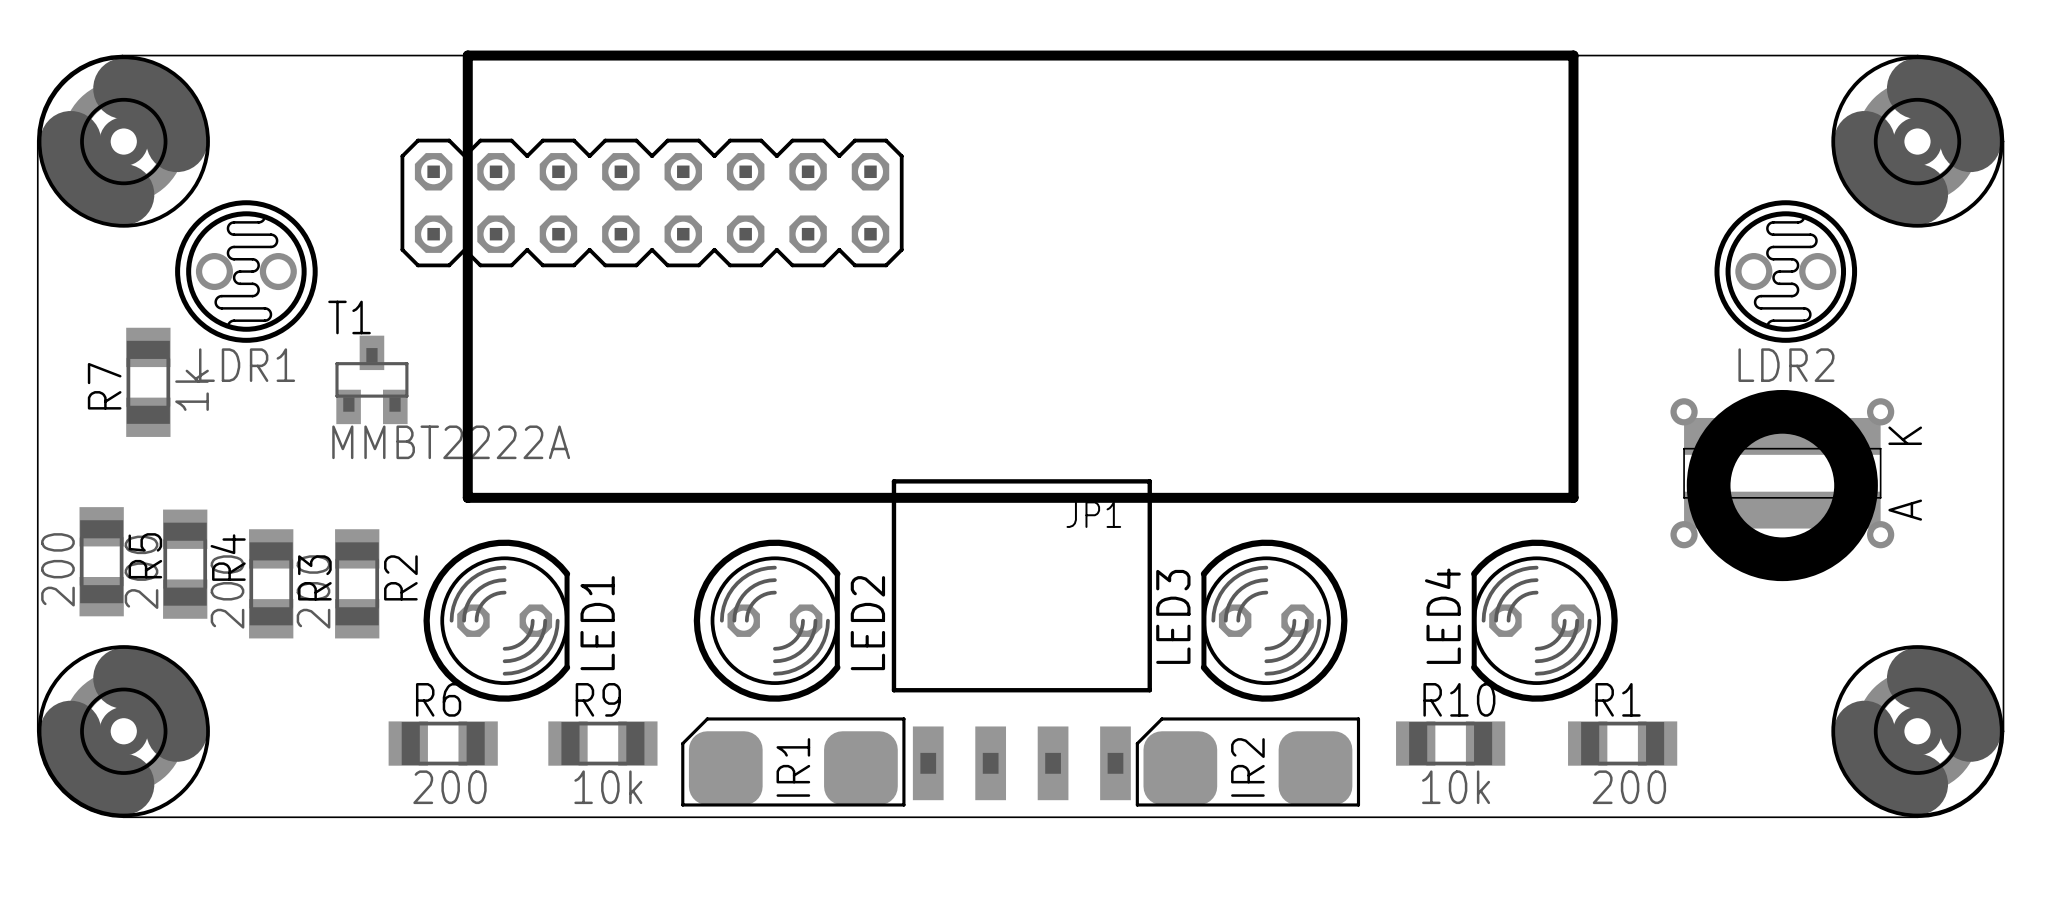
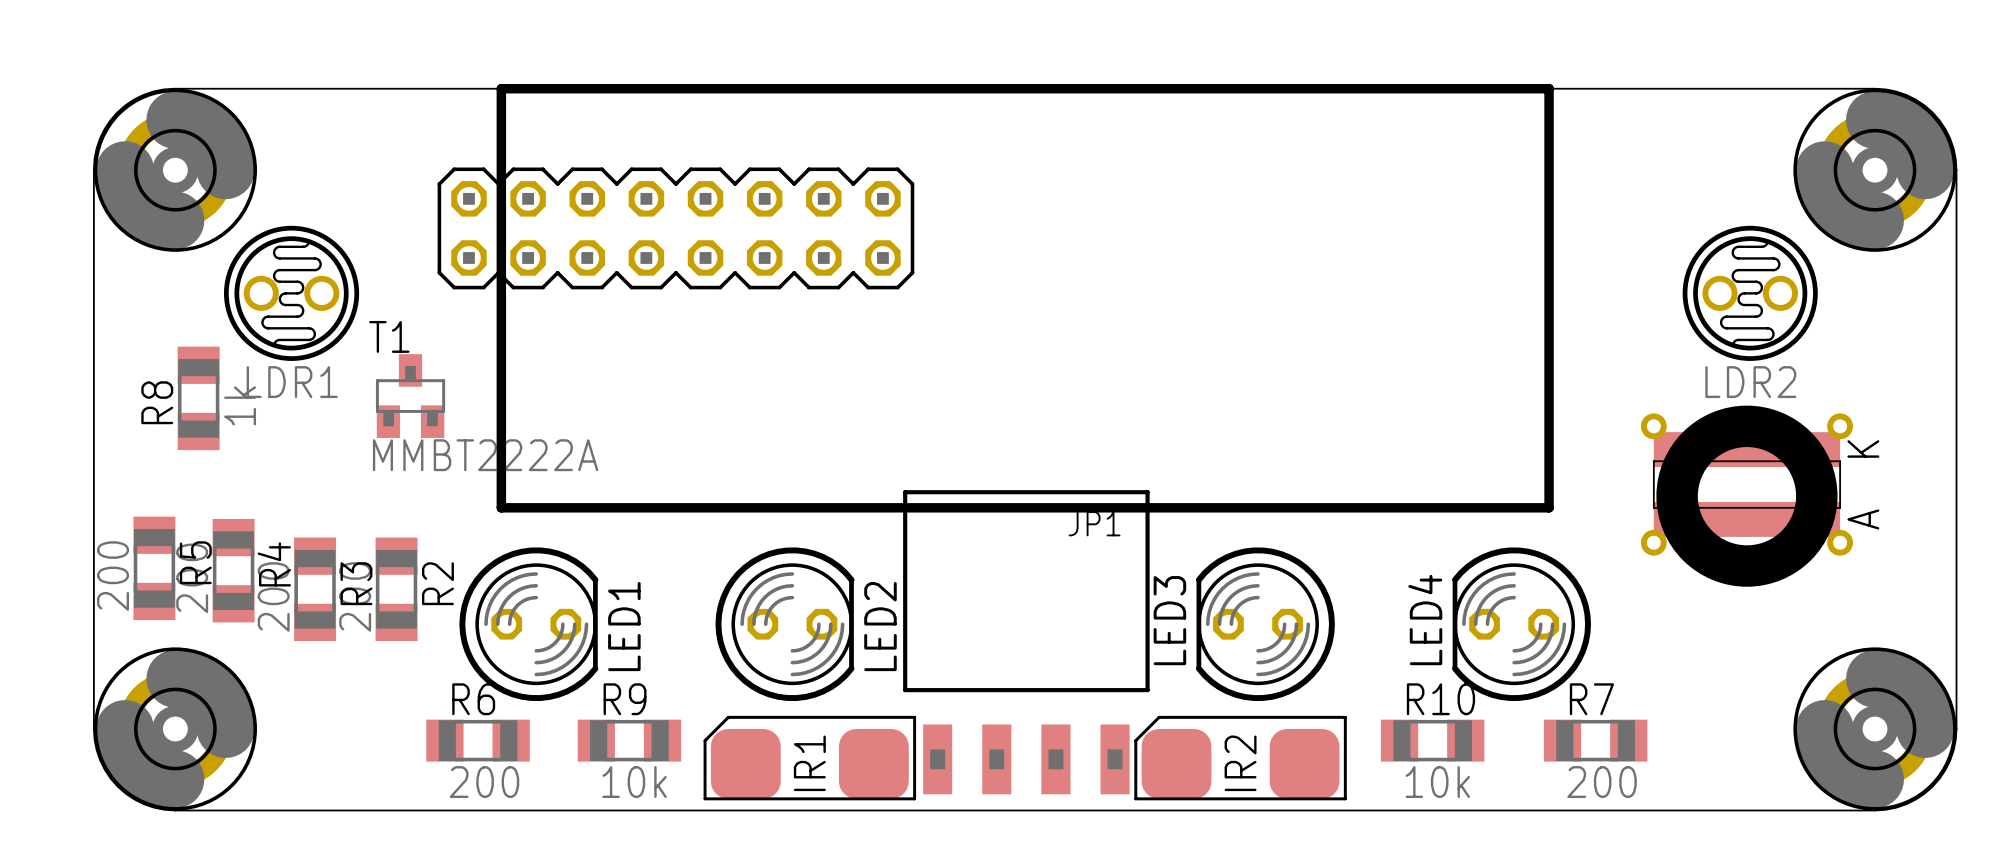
R7 name: R7 (104, 386) -> R8 (157, 402)
R1 name: R1 (1618, 699) -> R7 (1591, 699)

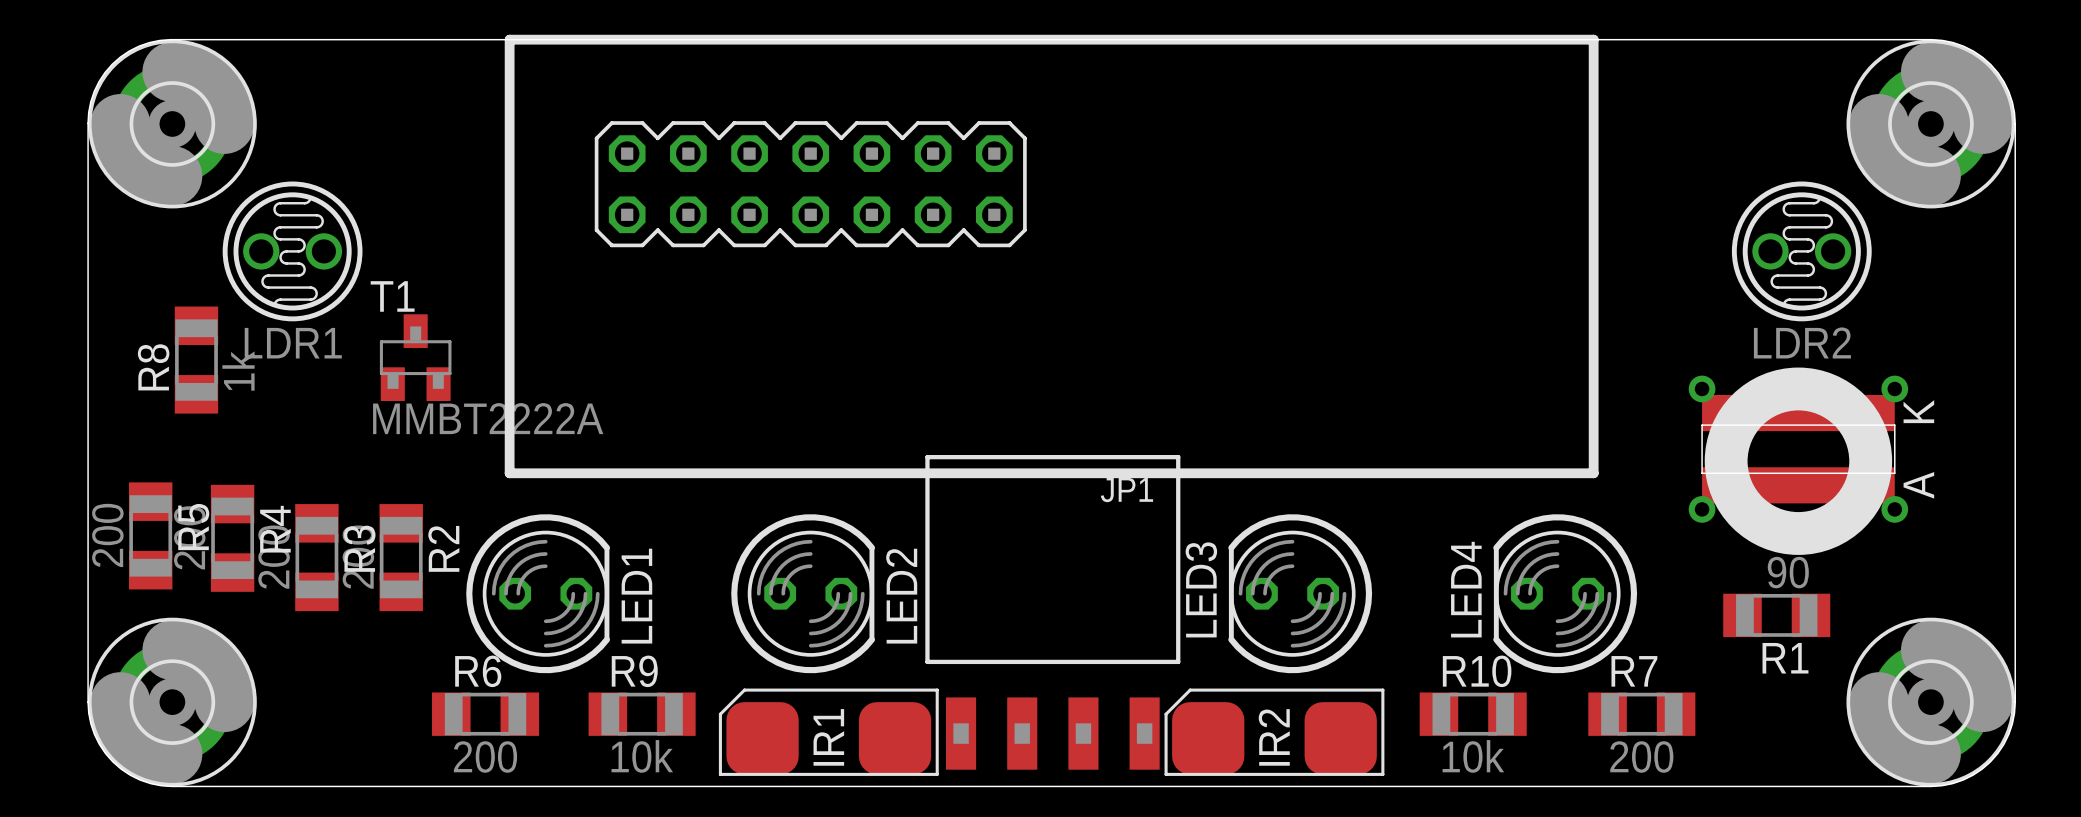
part: (675, 228) -> none
part: none -> (810, 184)
R1: none -> 90 (1776, 615)

